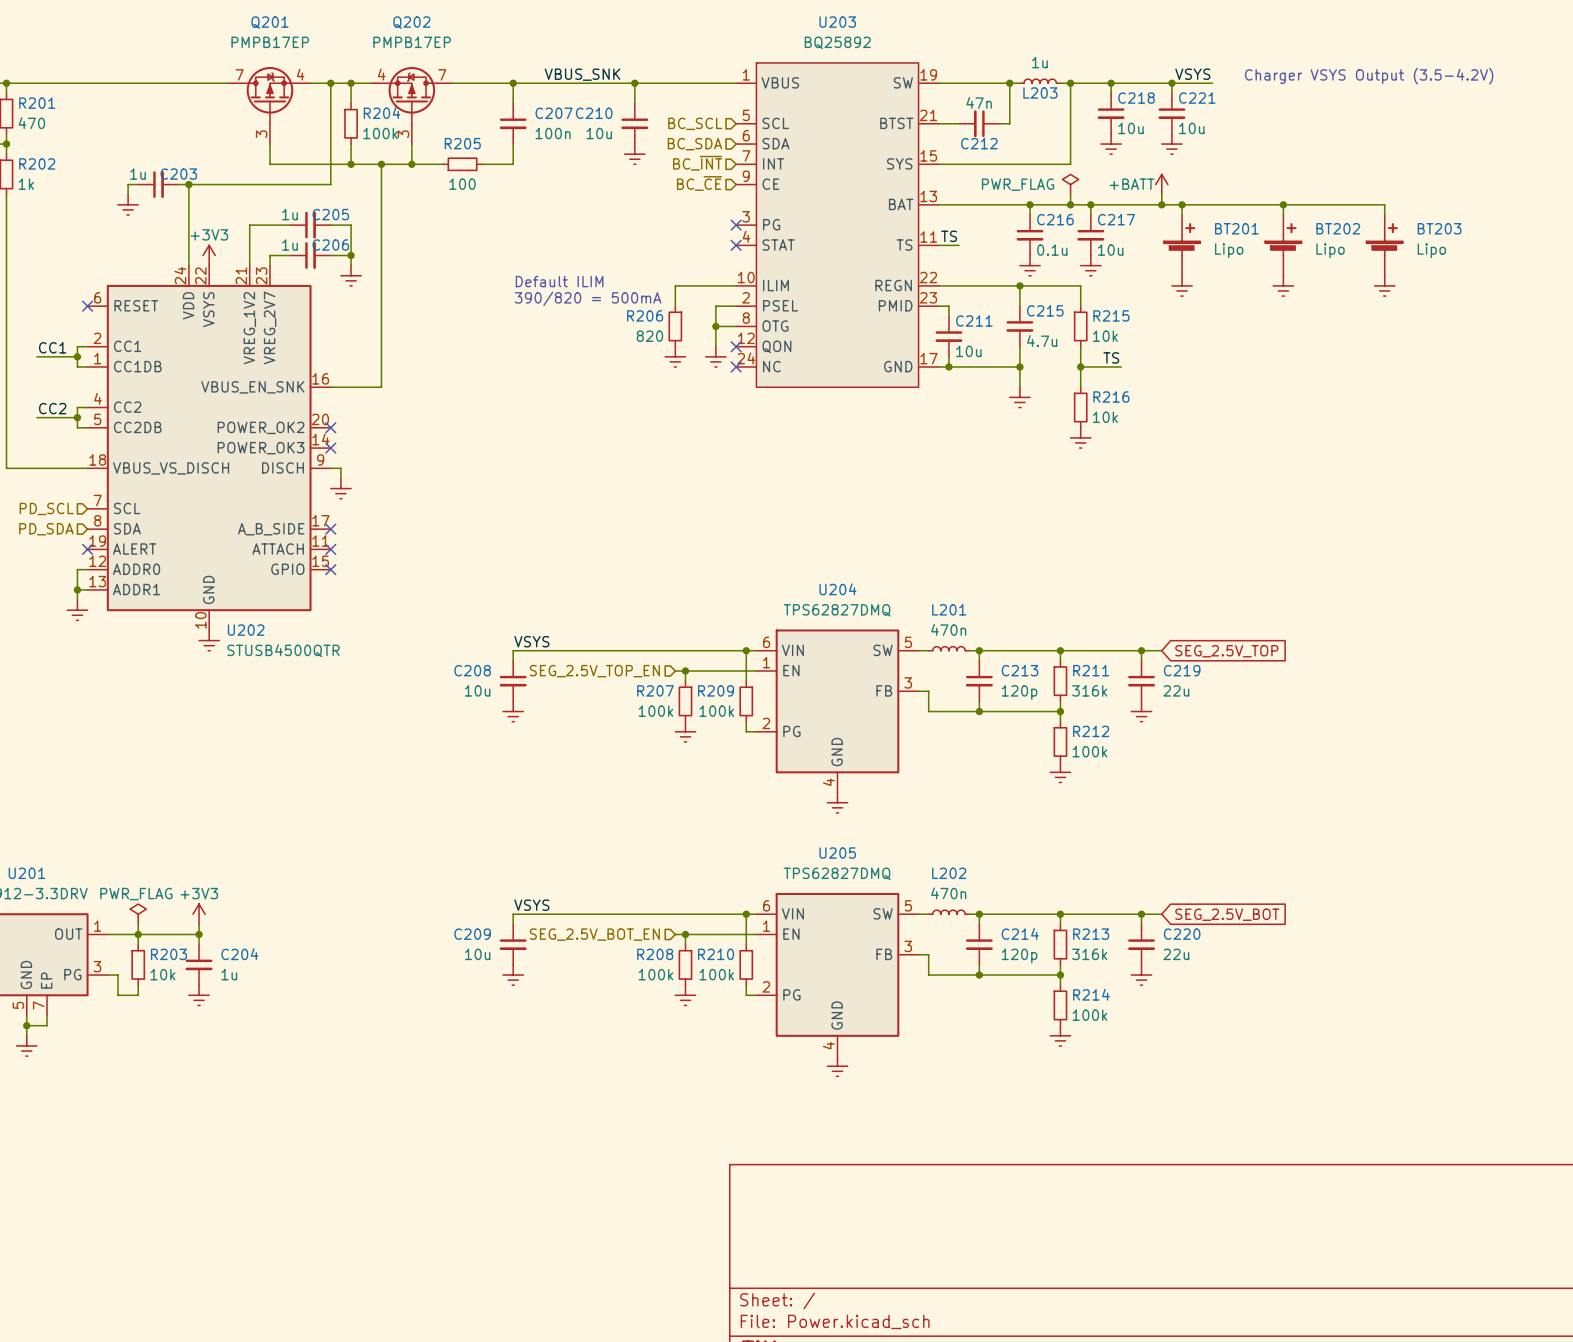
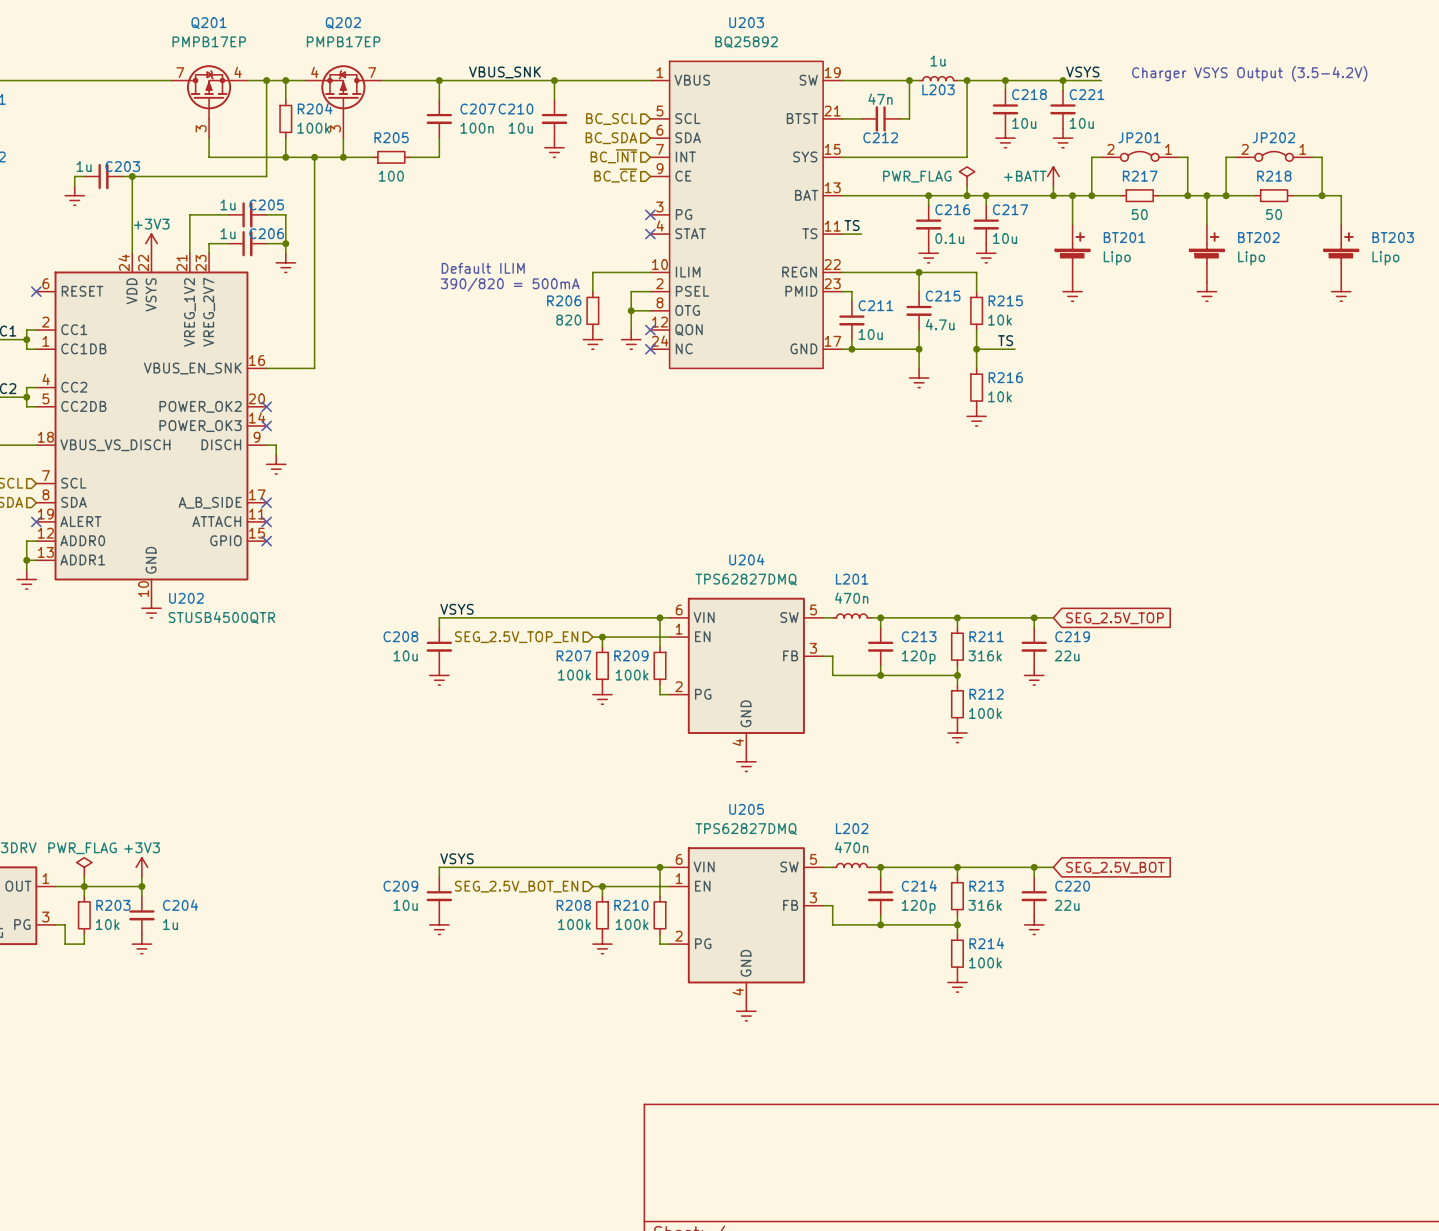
JP201: none -> (1139, 156)
JP202: none -> (1274, 156)
wire: none -> (1101, 157) (1091, 157) (1091, 195)
wire: none -> (1178, 157) (1187, 157) (1187, 195)
wire: none -> (1235, 157) (1226, 157) (1226, 195)
wire: none -> (1312, 157) (1322, 157) (1322, 195)
junction: none -> (1091, 195)
wire: (1232, 204) (1273, 204) -> none
R217: none -> 50 (1139, 195)
wire: (1283, 204) (1283, 214) -> none
junction: (1283, 204) -> none
junction: none -> (1187, 195)
wire: none -> (1206, 195) (1206, 224)
junction: none -> (1206, 195)
junction: none -> (1226, 195)
wire: (1374, 204) (1384, 204) (1384, 214) -> none
R218: none -> 50 (1274, 195)
wire: none -> (1293, 195) (1341, 195) (1341, 224)
junction: none -> (1322, 195)
BT201 position: (1182, 245) -> (1072, 253)
BT202 position: (1283, 245) -> (1206, 253)
BT203 position: (1384, 245) -> (1341, 253)
power symbol position: (1182, 285) -> (1072, 291)
power symbol: (1283, 285) -> none
power symbol: (1384, 285) -> none
power symbol: none -> (1206, 291)
power symbol: none -> (1341, 291)

